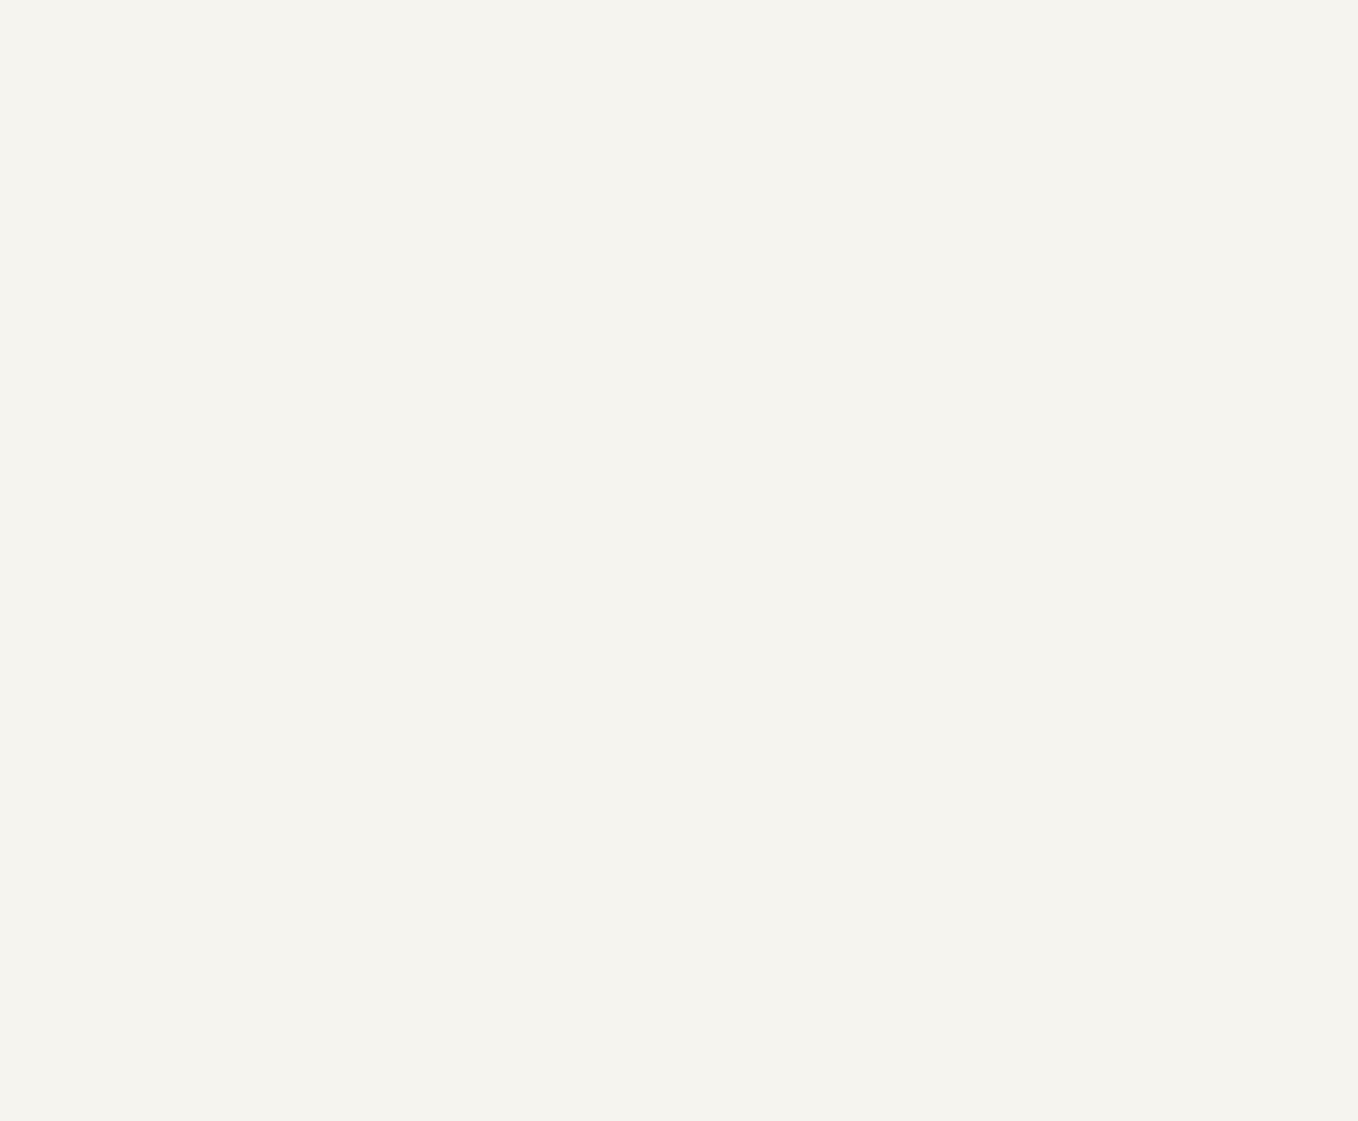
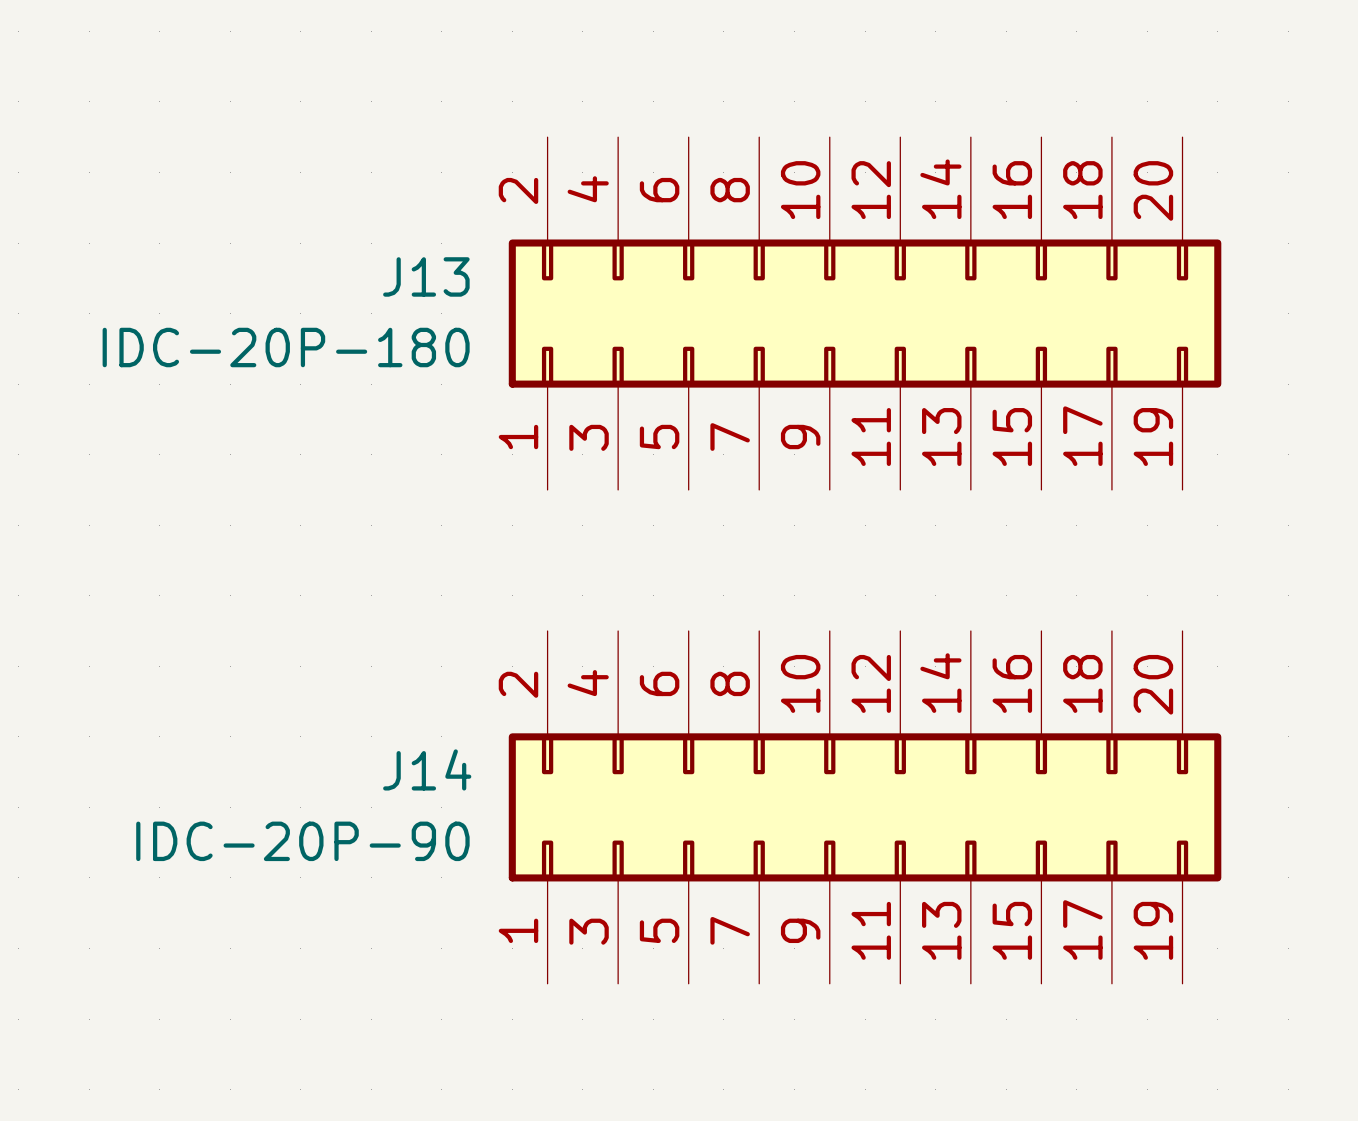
J13: none -> IDC-20P-180 (865, 313)
J14: none -> IDC-20P-90 (865, 807)

